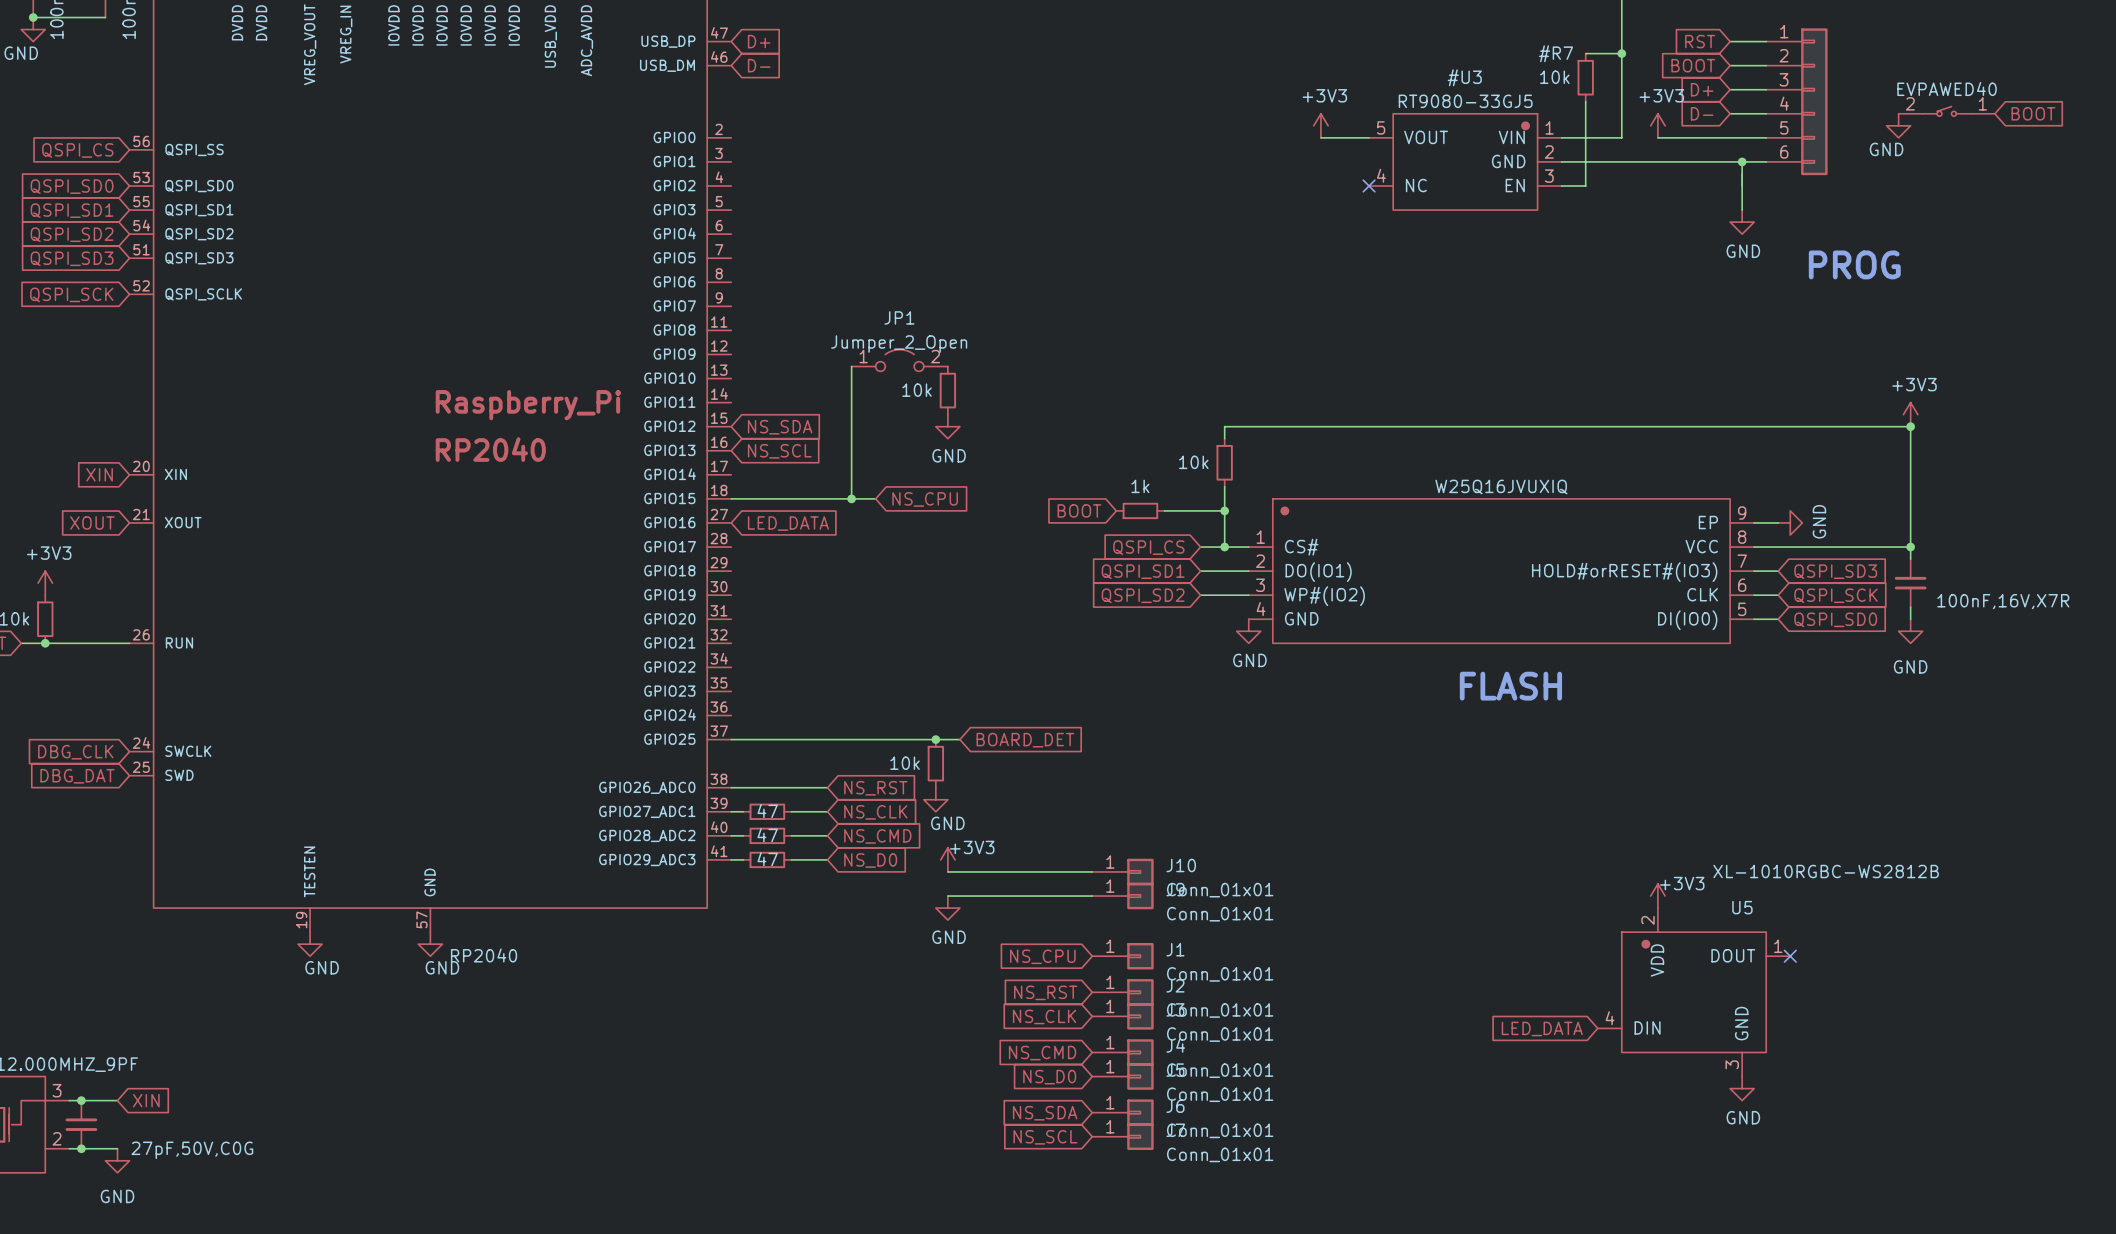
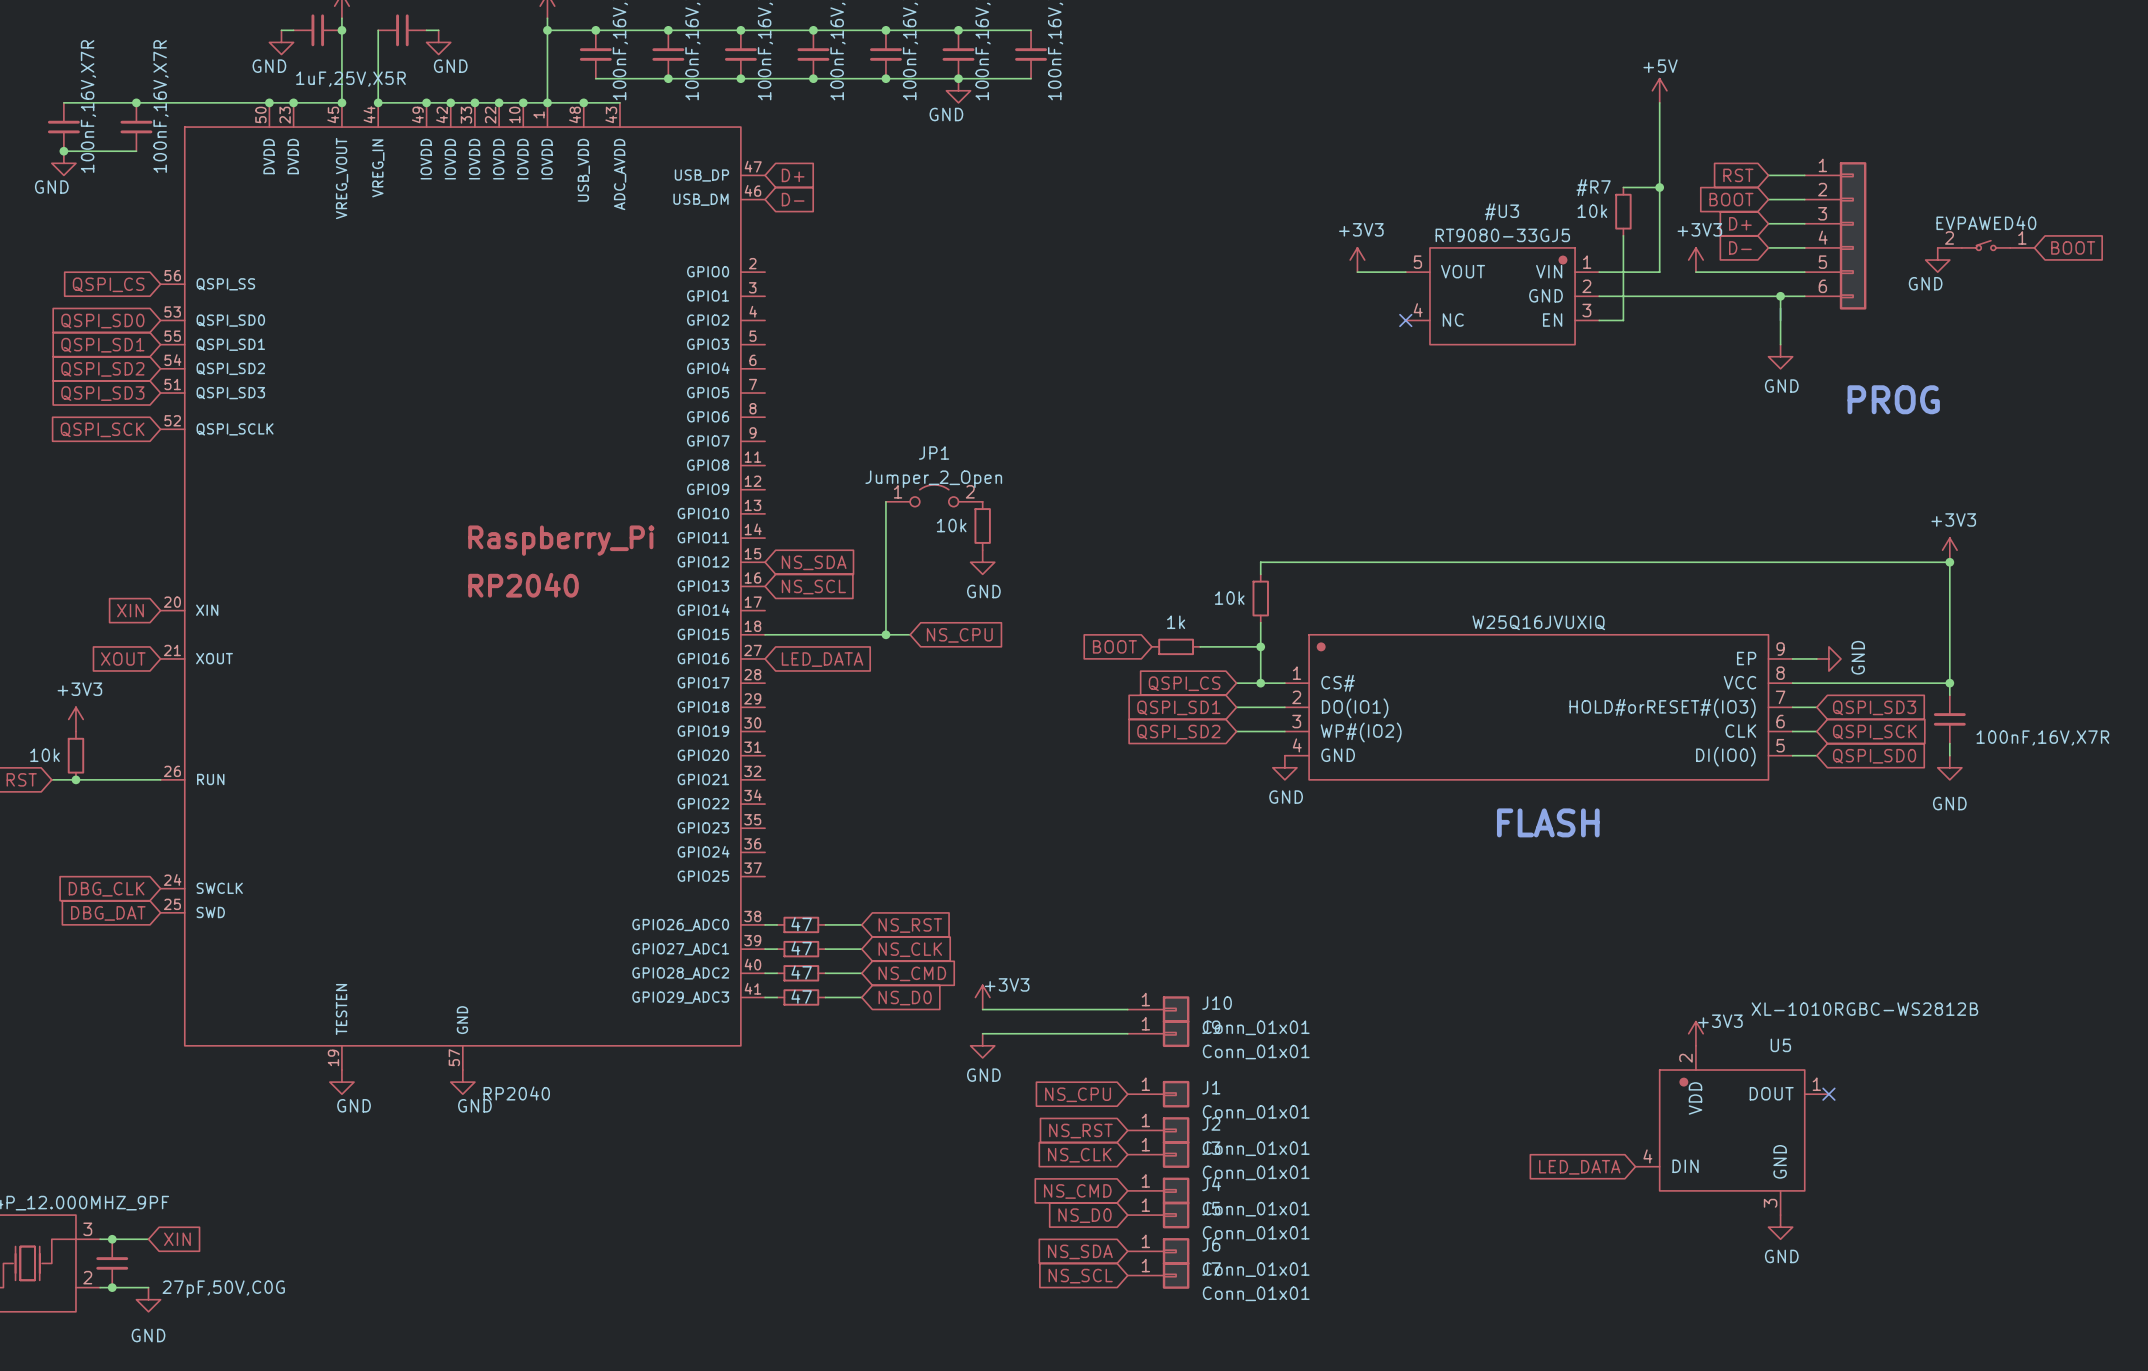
wire: (731, 739) (959, 739) -> none
junction: (935, 739) -> none
global label: BOARD_DET (1025, 740) -> none
part: 10k (935, 763) -> none
wire: (743, 787) (791, 787) -> none
part: none -> 47 (801, 924)
power symbol: GND (935, 799) -> none

